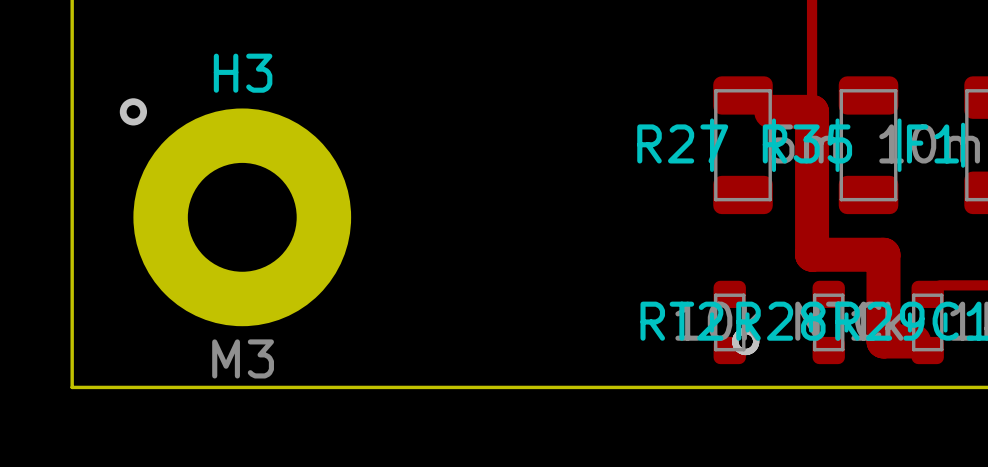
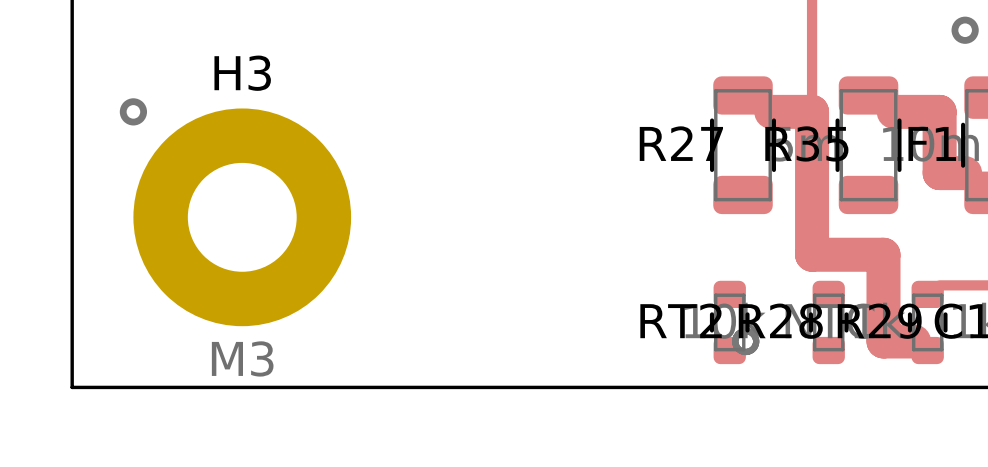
via: none -> (965, 30)
track: none -> (893, 111) (939, 111) (939, 173) (965, 173)

